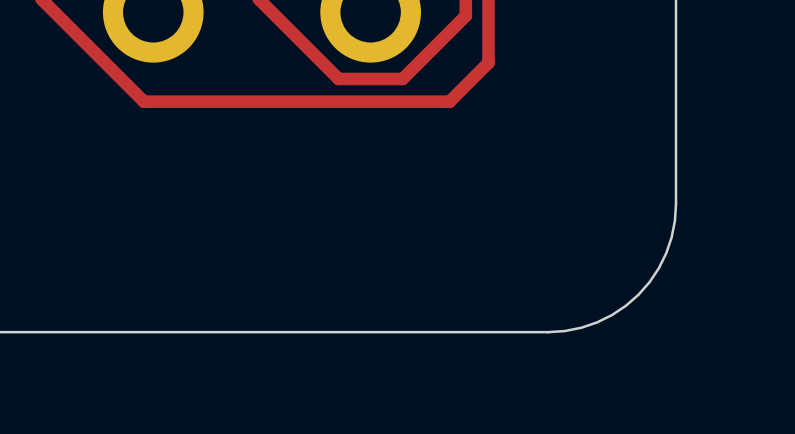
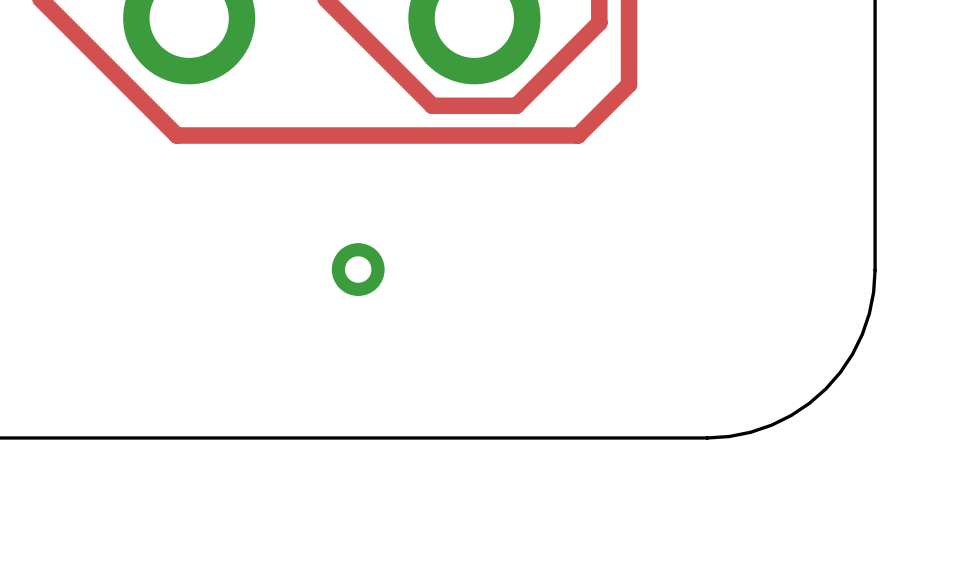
via: none -> (358, 269)

